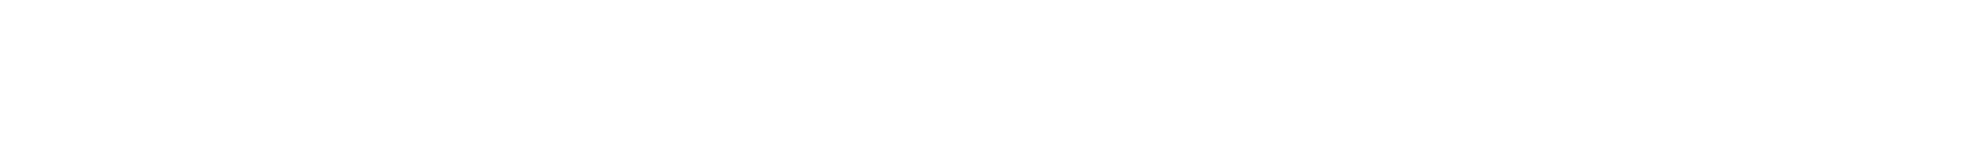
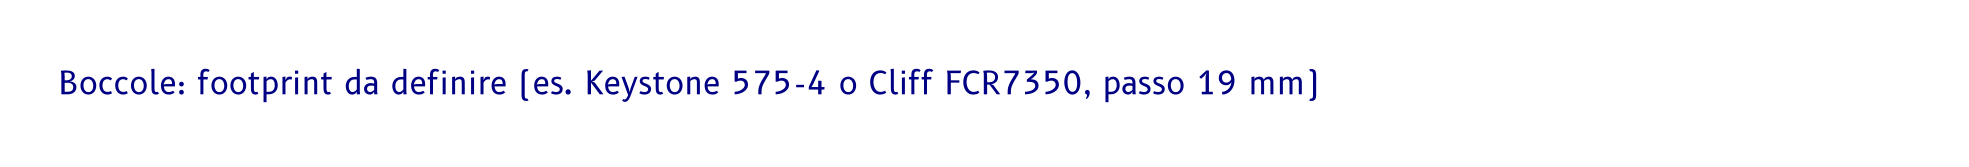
text: none -> Boccole: footprint da definire (es. Keystone 575-4 o Cliff FCR7350, passo 19 mm) (688, 85)

